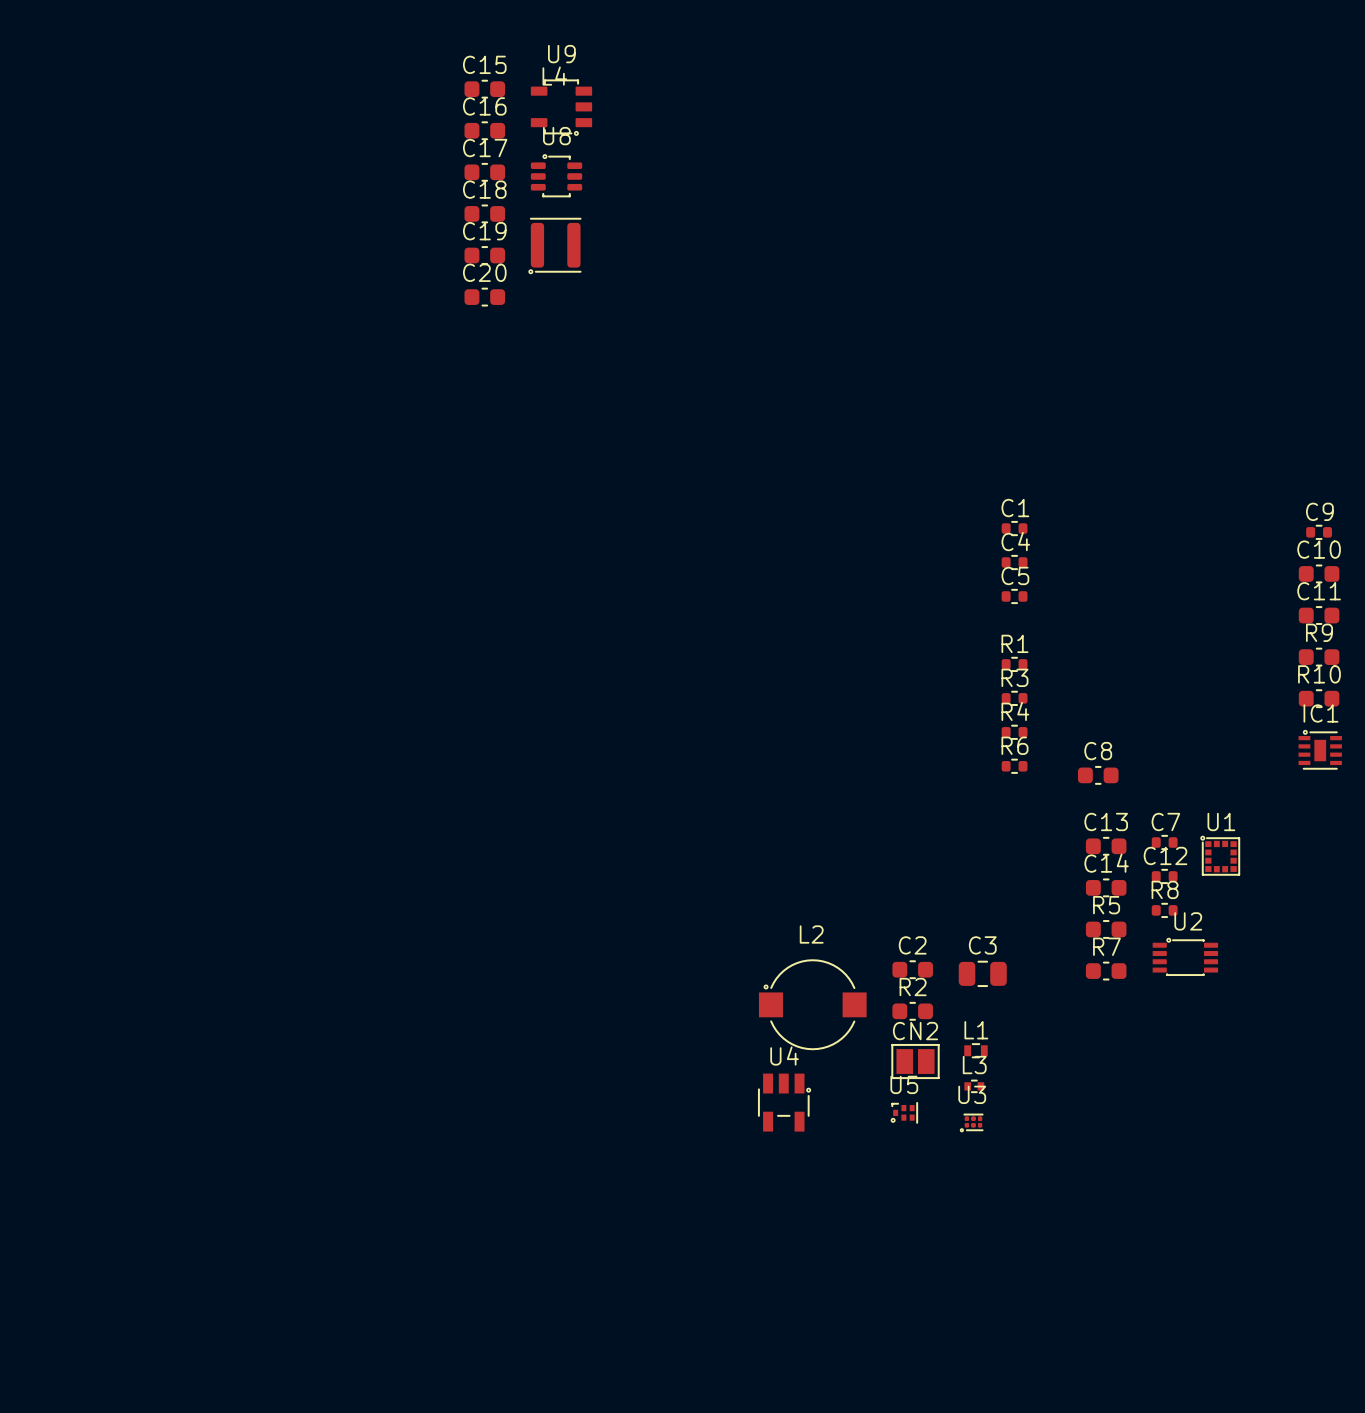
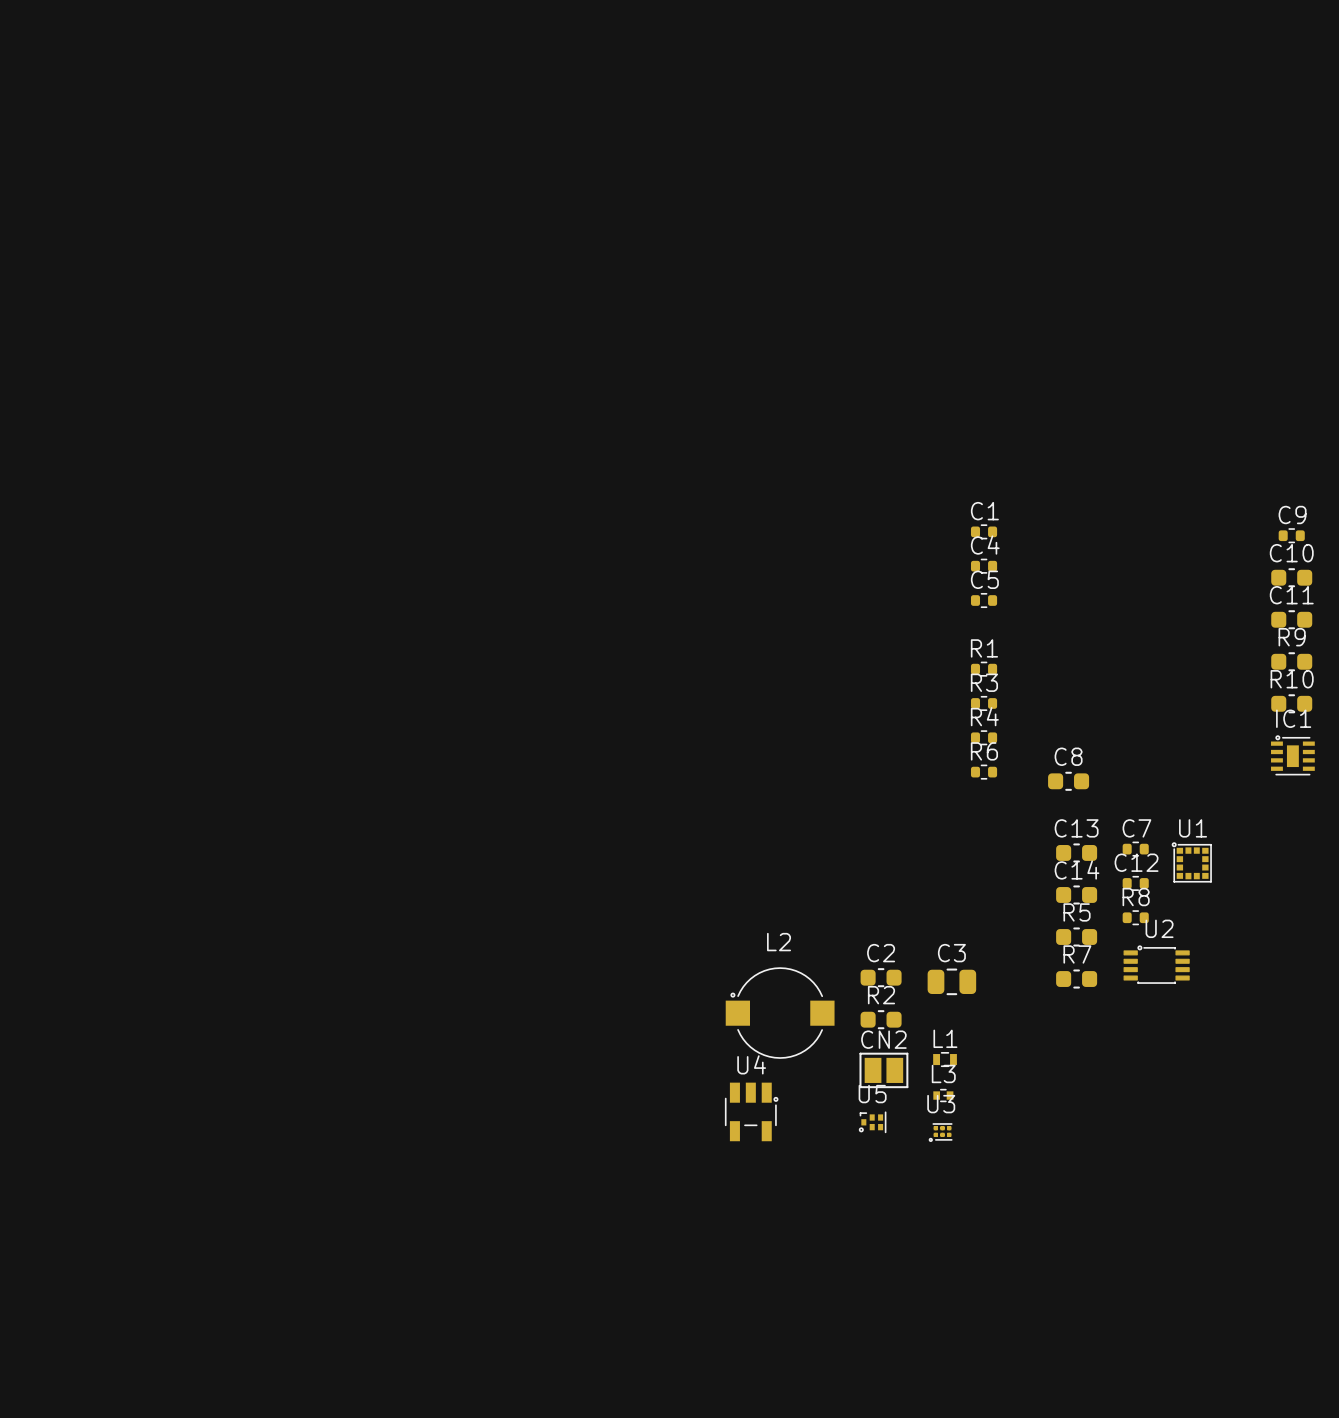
C15: (484, 89) -> none
U9: (561, 107) -> none
C16: (484, 130) -> none
C17: (484, 172) -> none
U8: (556, 175) -> none
C18: (484, 213) -> none
L4: (554, 246) -> none
C19: (484, 255) -> none
C20: (484, 297) -> none

